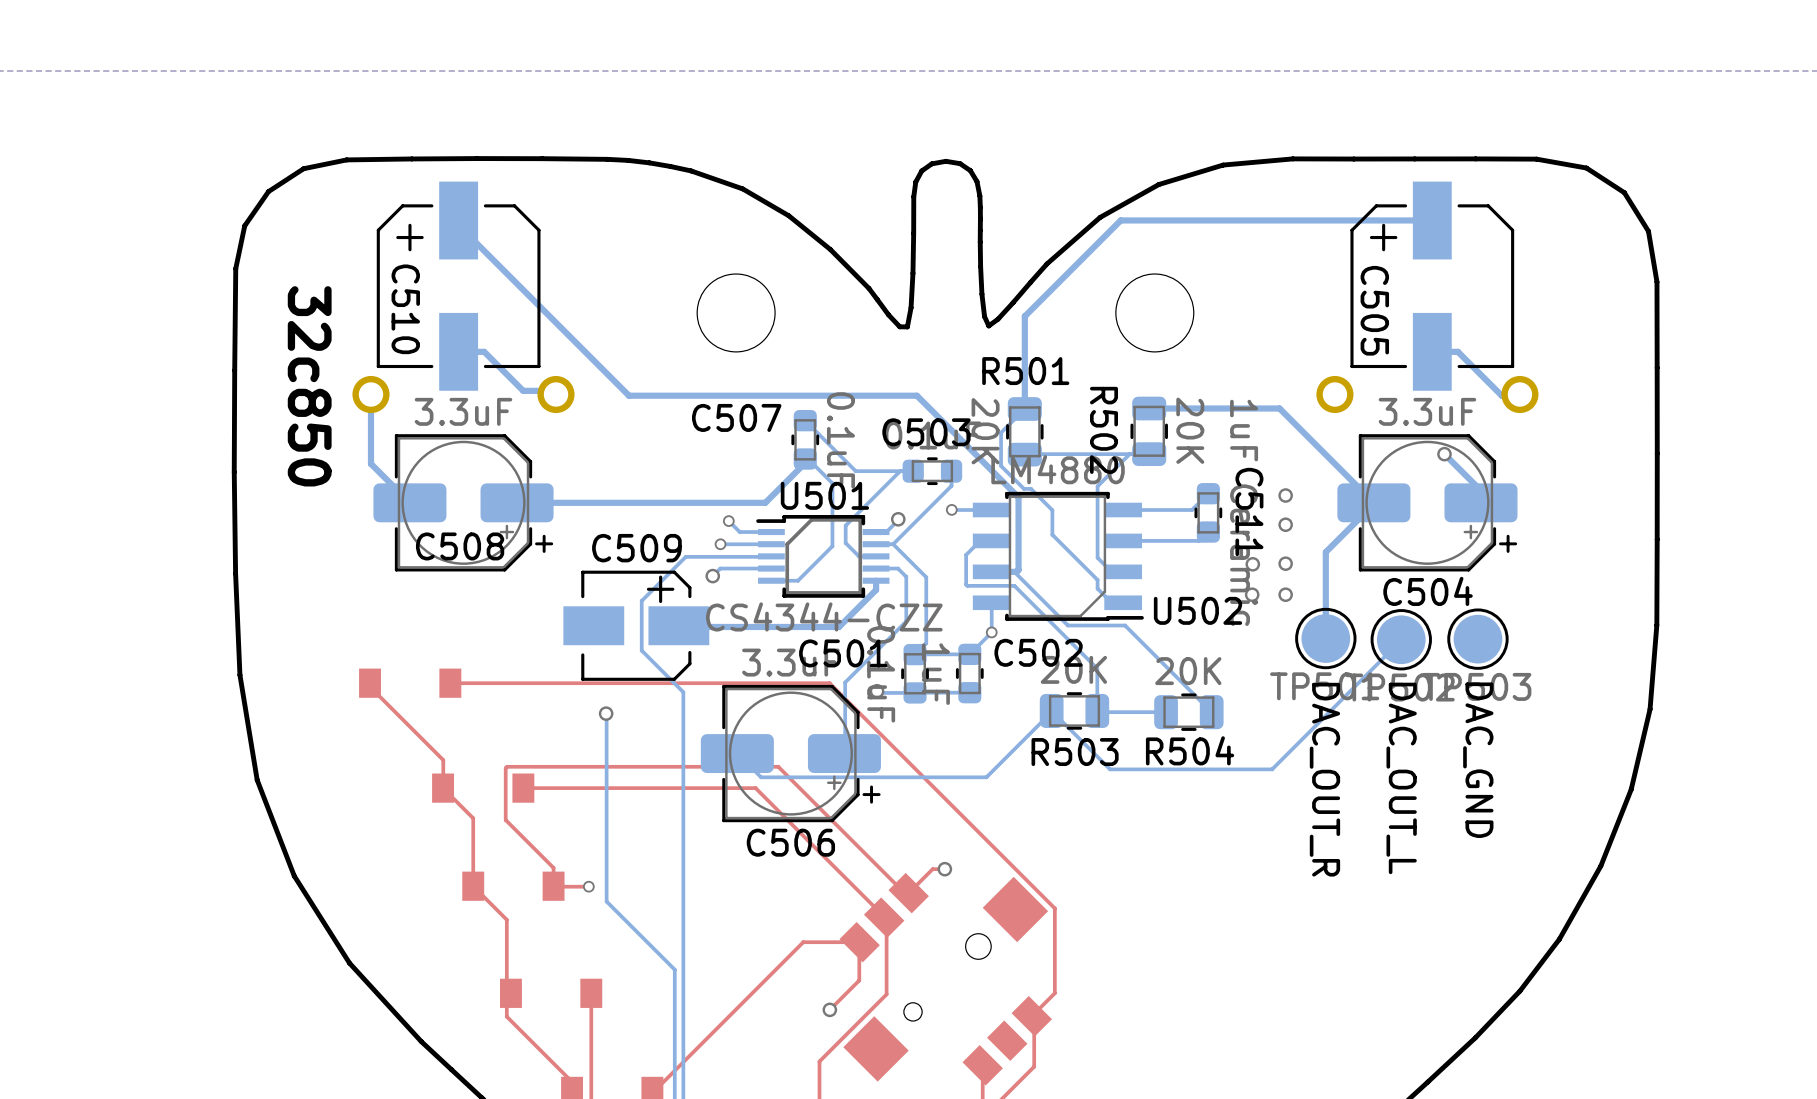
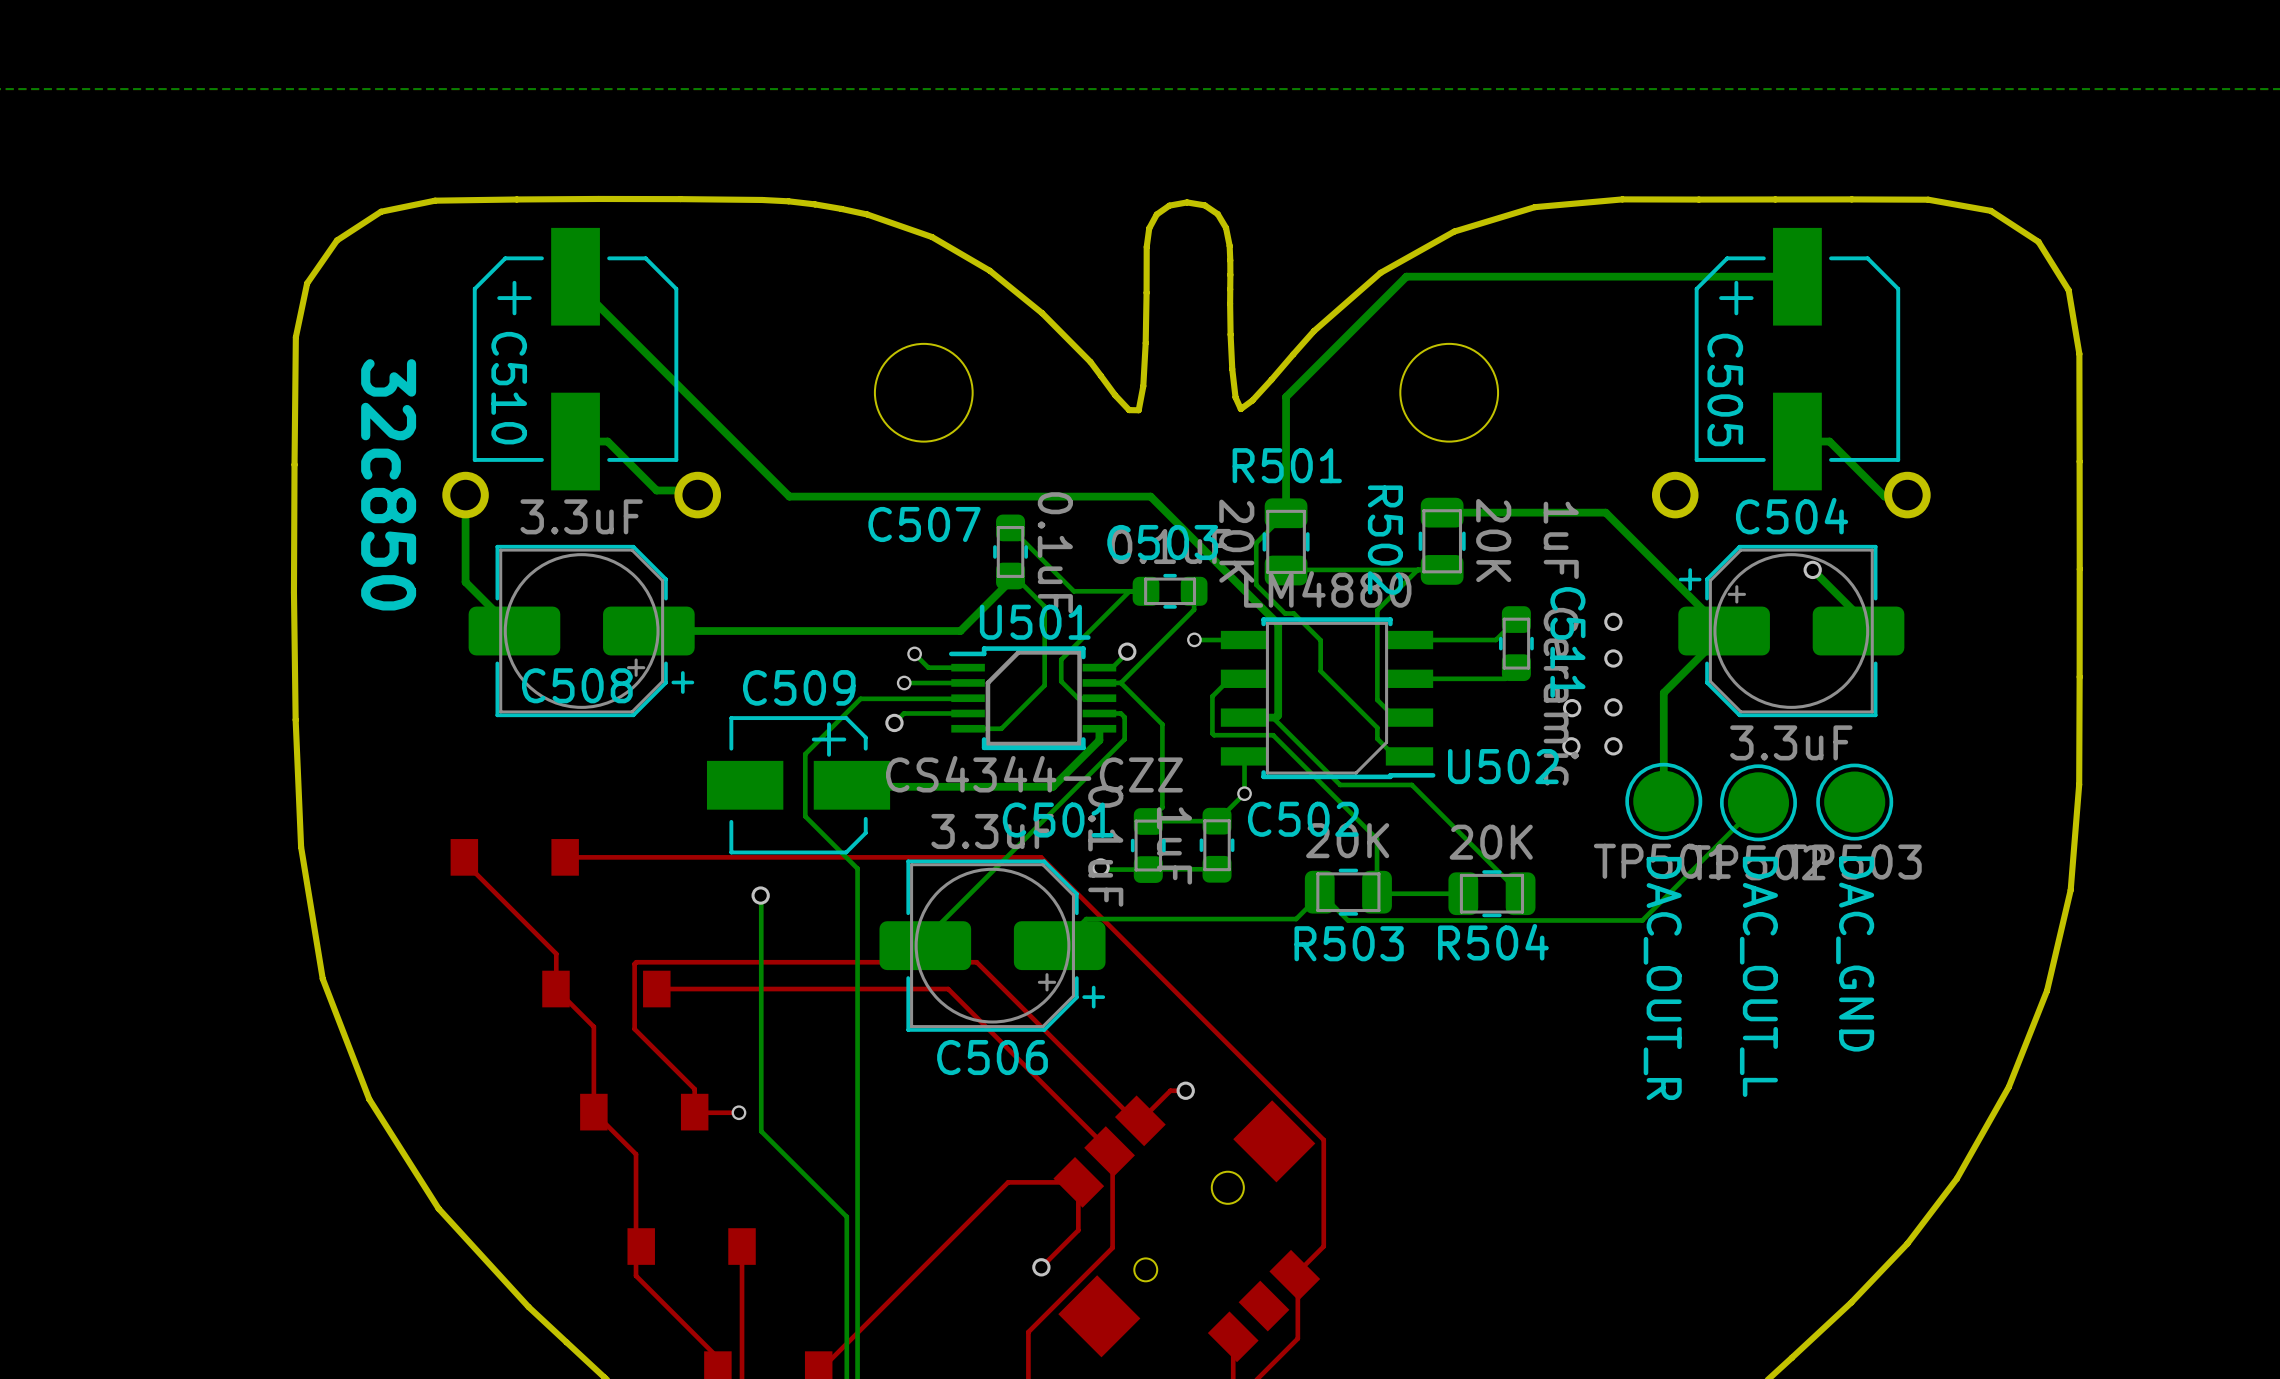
C504 rotation: 0° (1427, 502) -> 180° (1791, 631)
bottom track: (893, 568) (898, 568) (906, 576) (906, 621) (845, 682) (845, 751) -> (1120, 713) (1124, 717) (1124, 739) (929, 934)
bottom track: (1401, 640) (1272, 769) (1110, 769) (1074, 733) -> (1758, 804) (1642, 920) (1348, 920)
bottom track: (1050, 713) (986, 777) (761, 777) (737, 753) -> none
bottom track: none -> (1320, 894) (1296, 919) (1086, 919) (1059, 945)

